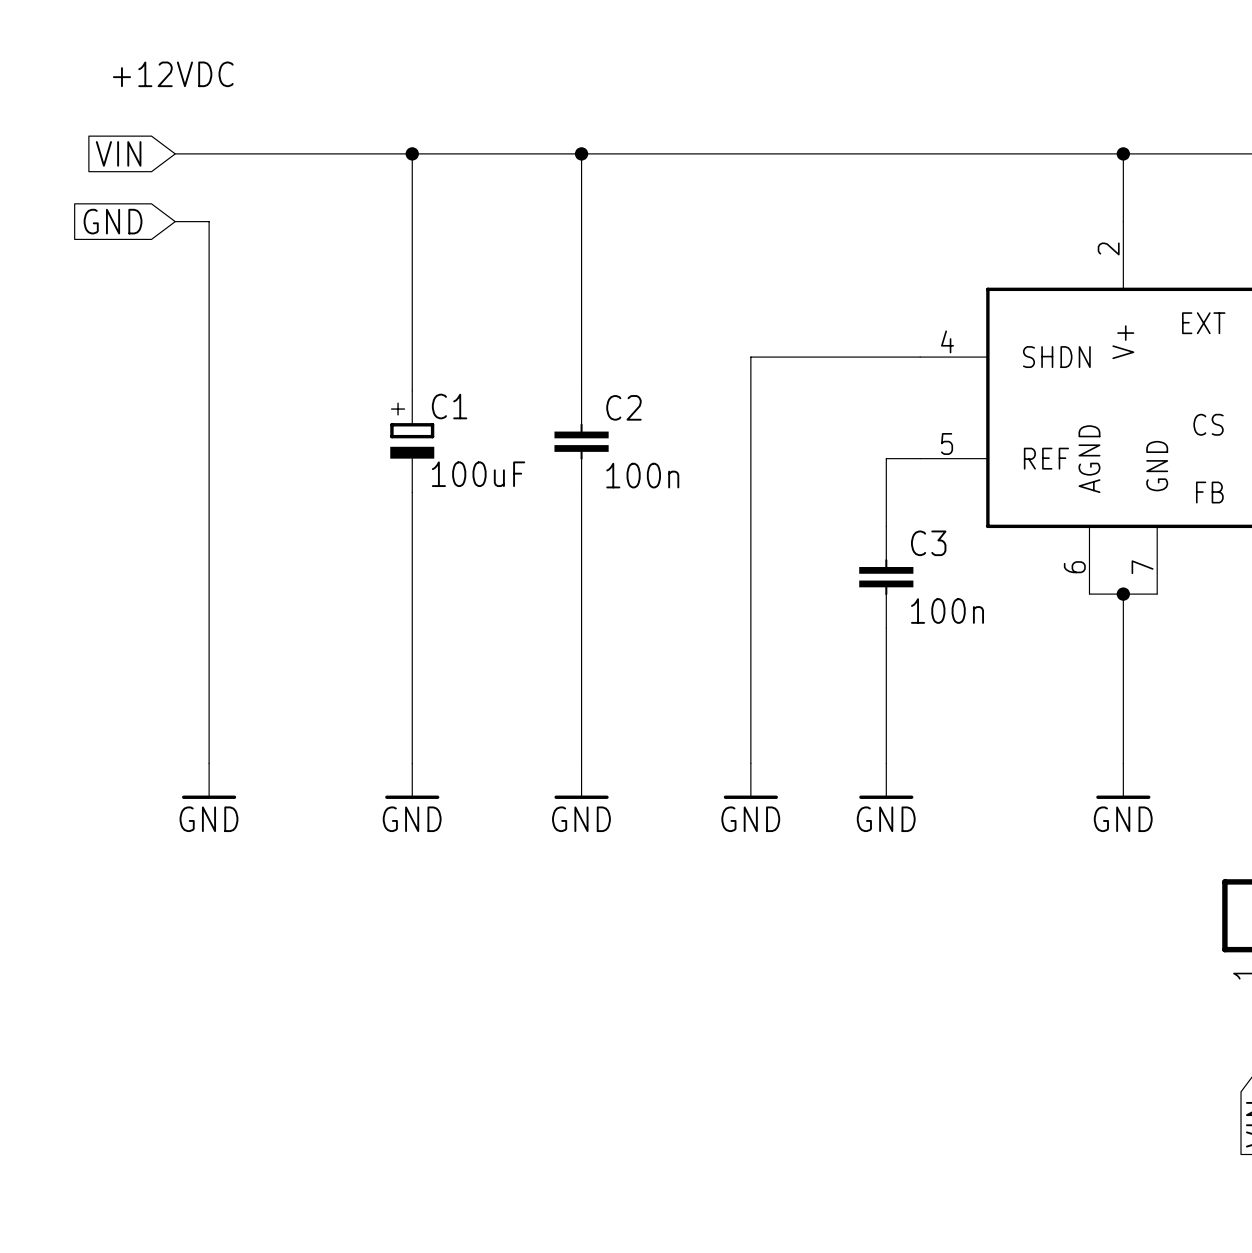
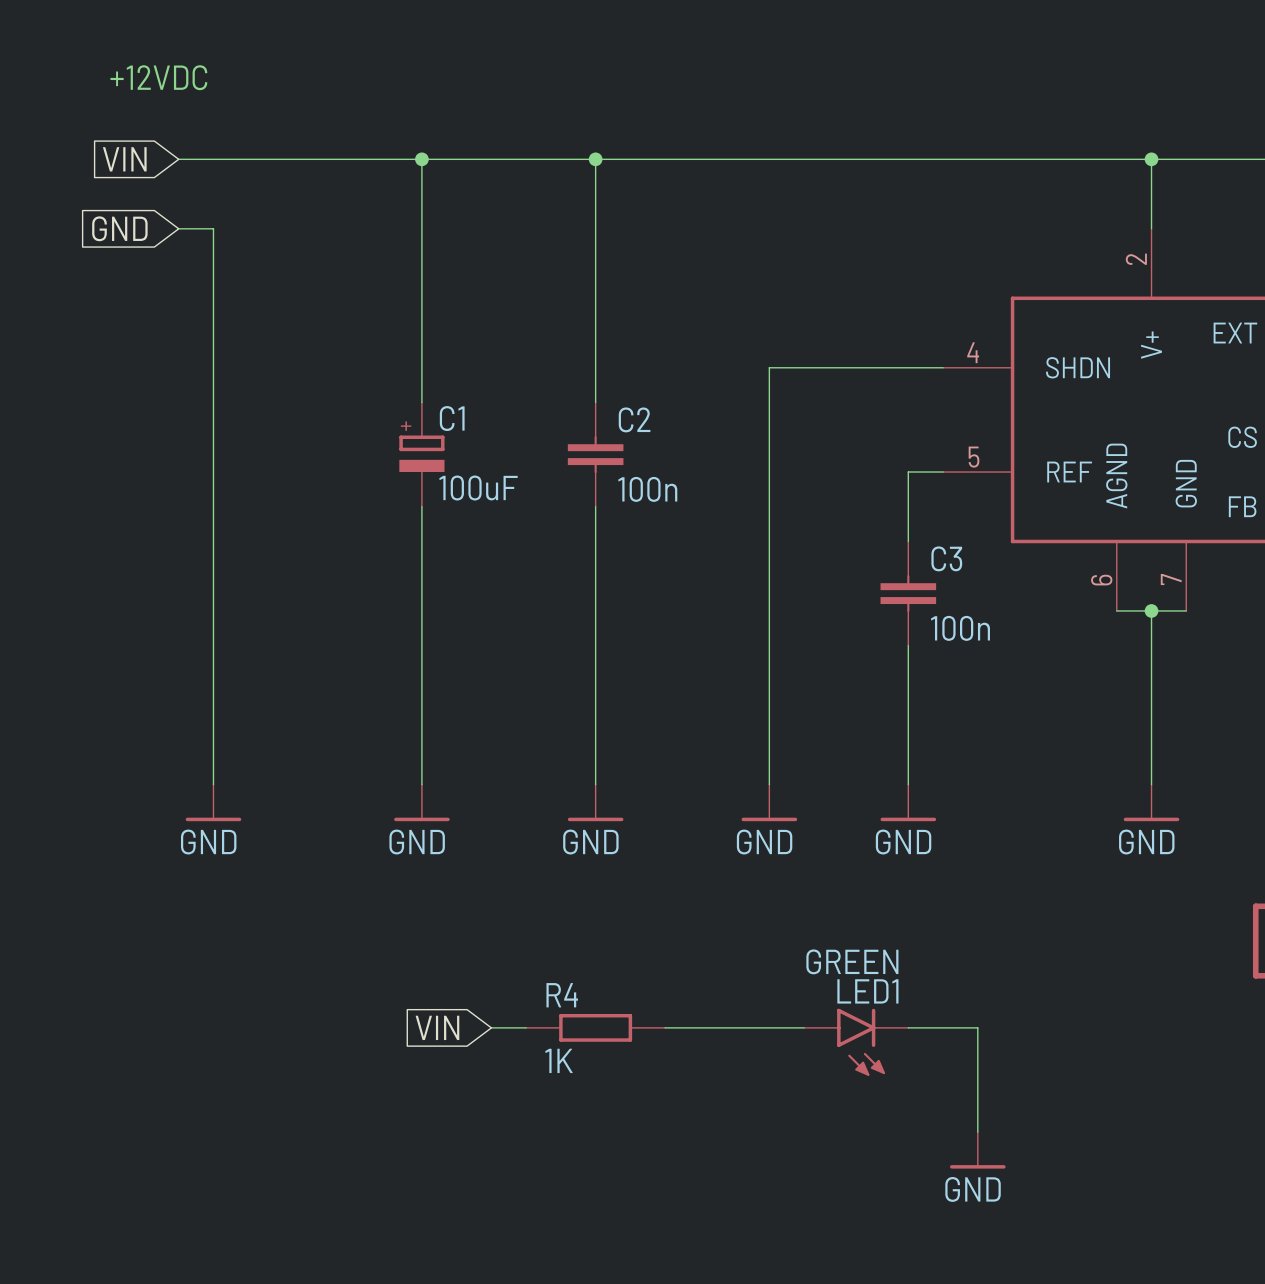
global label: none -> VIN (437, 1027)
wire: none -> (491, 1027) (526, 1027)
R4: none -> 1K (595, 1027)
wire: none -> (665, 1027) (804, 1027)
wire: none -> (908, 1027) (977, 1027) (977, 1132)
LED1: none -> GREEN (856, 1042)
power symbol: none -> GND (977, 1150)

